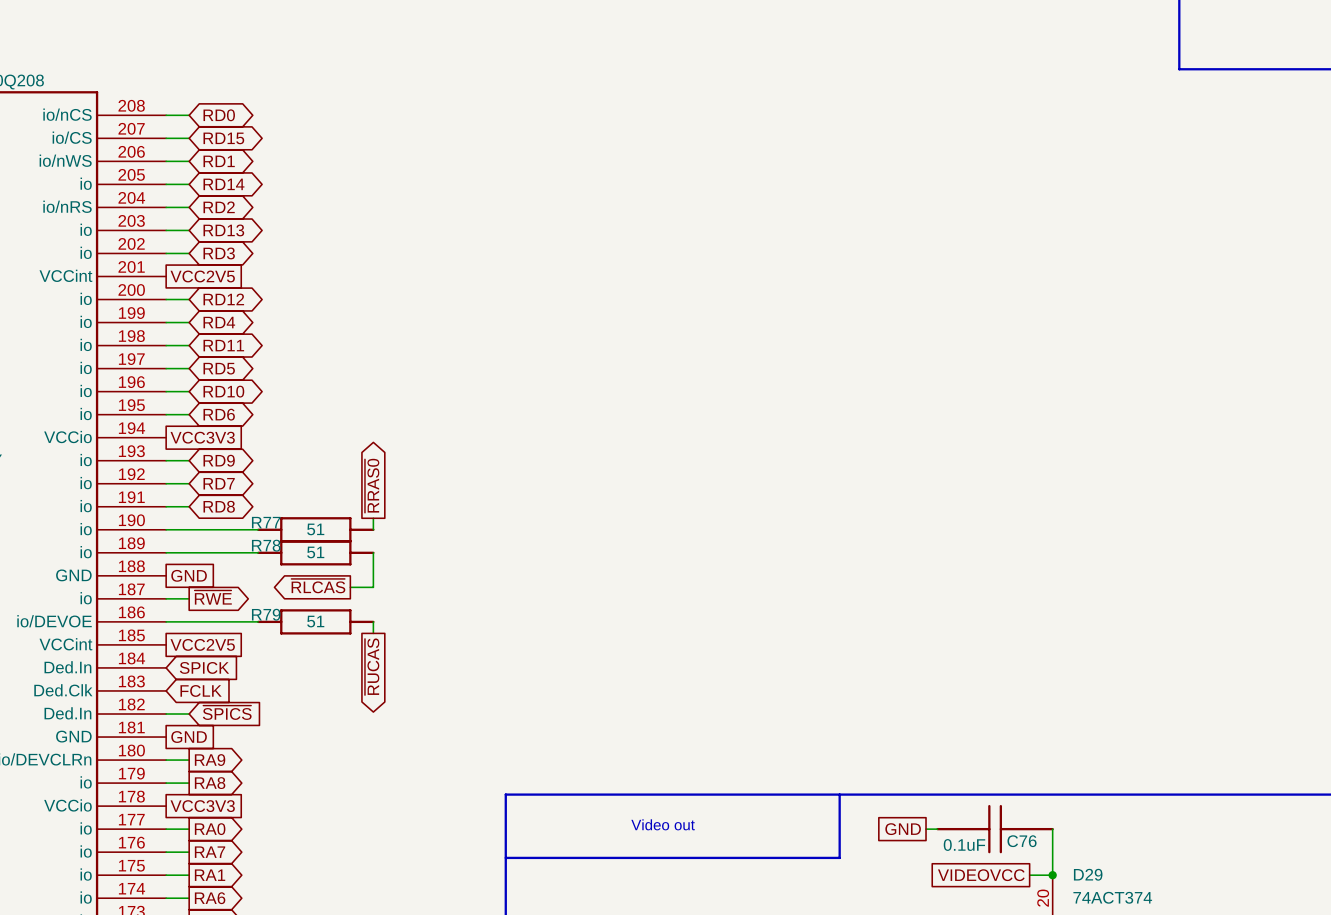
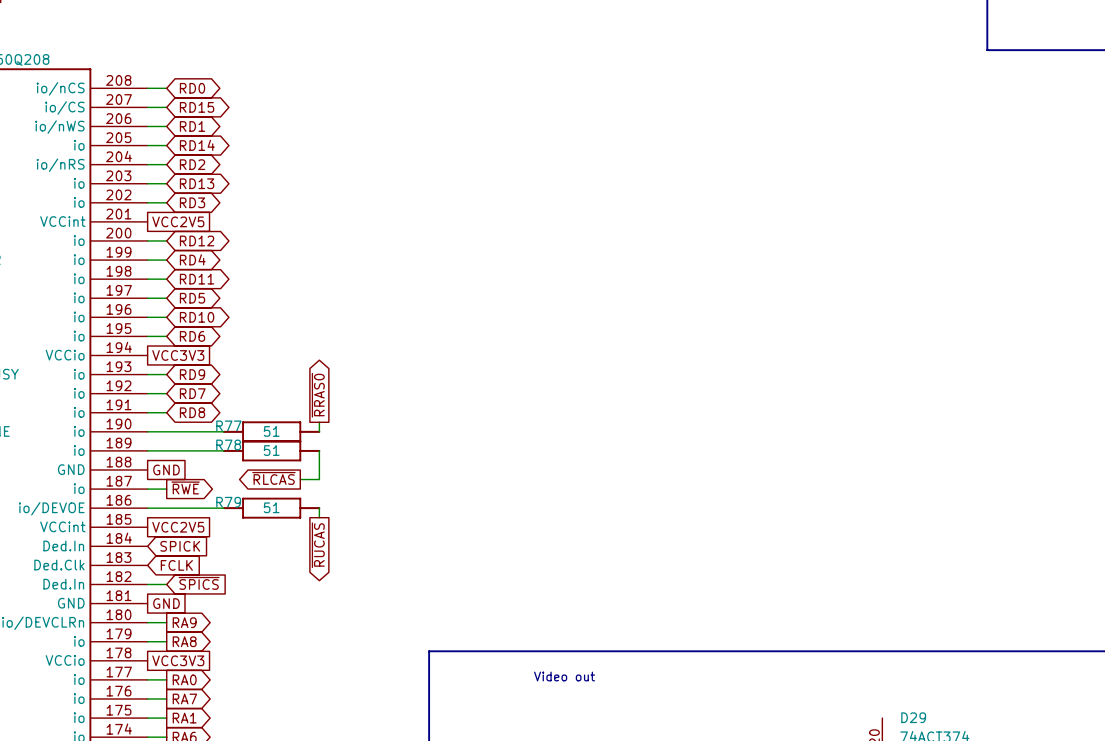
line: (839, 794) (839, 857) (505, 857) -> none
global label: GND (903, 829) -> none
wire: (926, 829) (937, 829) -> none
C76: 0.1uF (995, 829) -> none
wire: (1052, 829) (1052, 875) (1029, 875) -> none
global label: VIDEOVCC (981, 875) -> none
junction: (1052, 875) -> none

